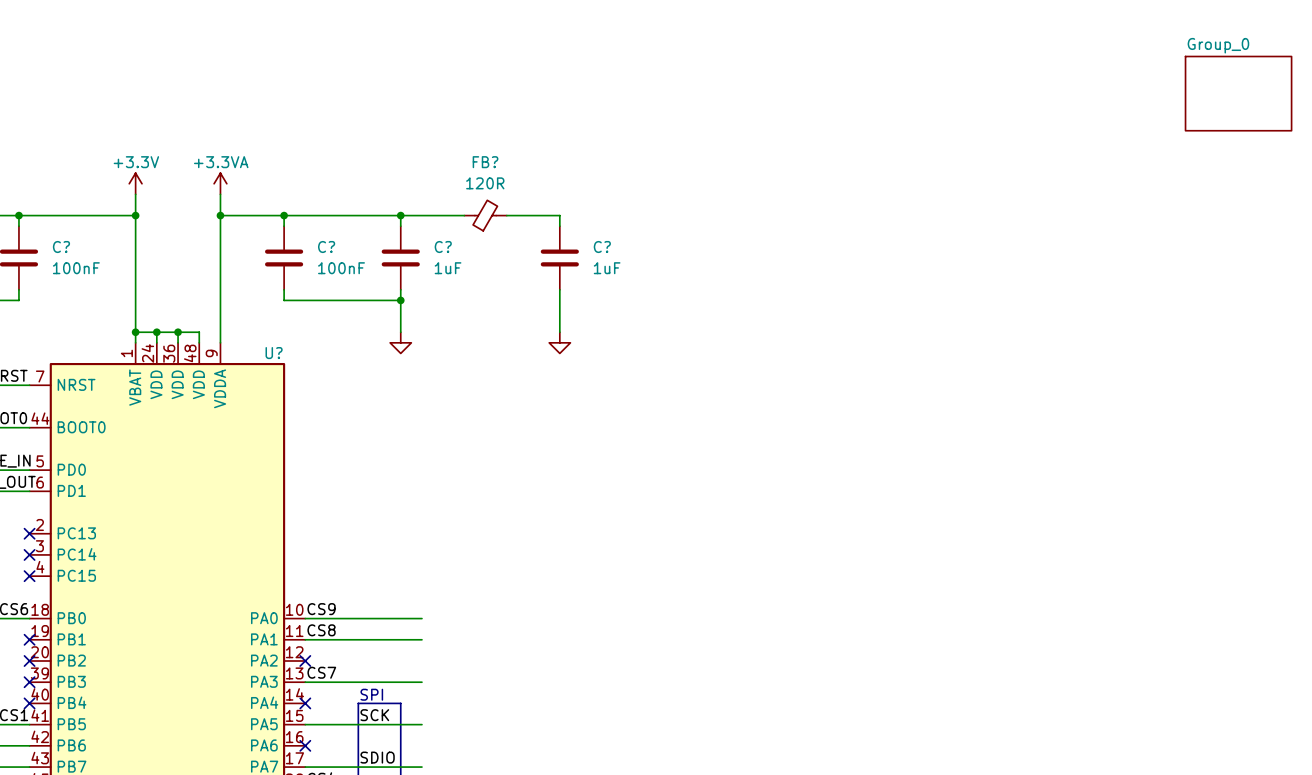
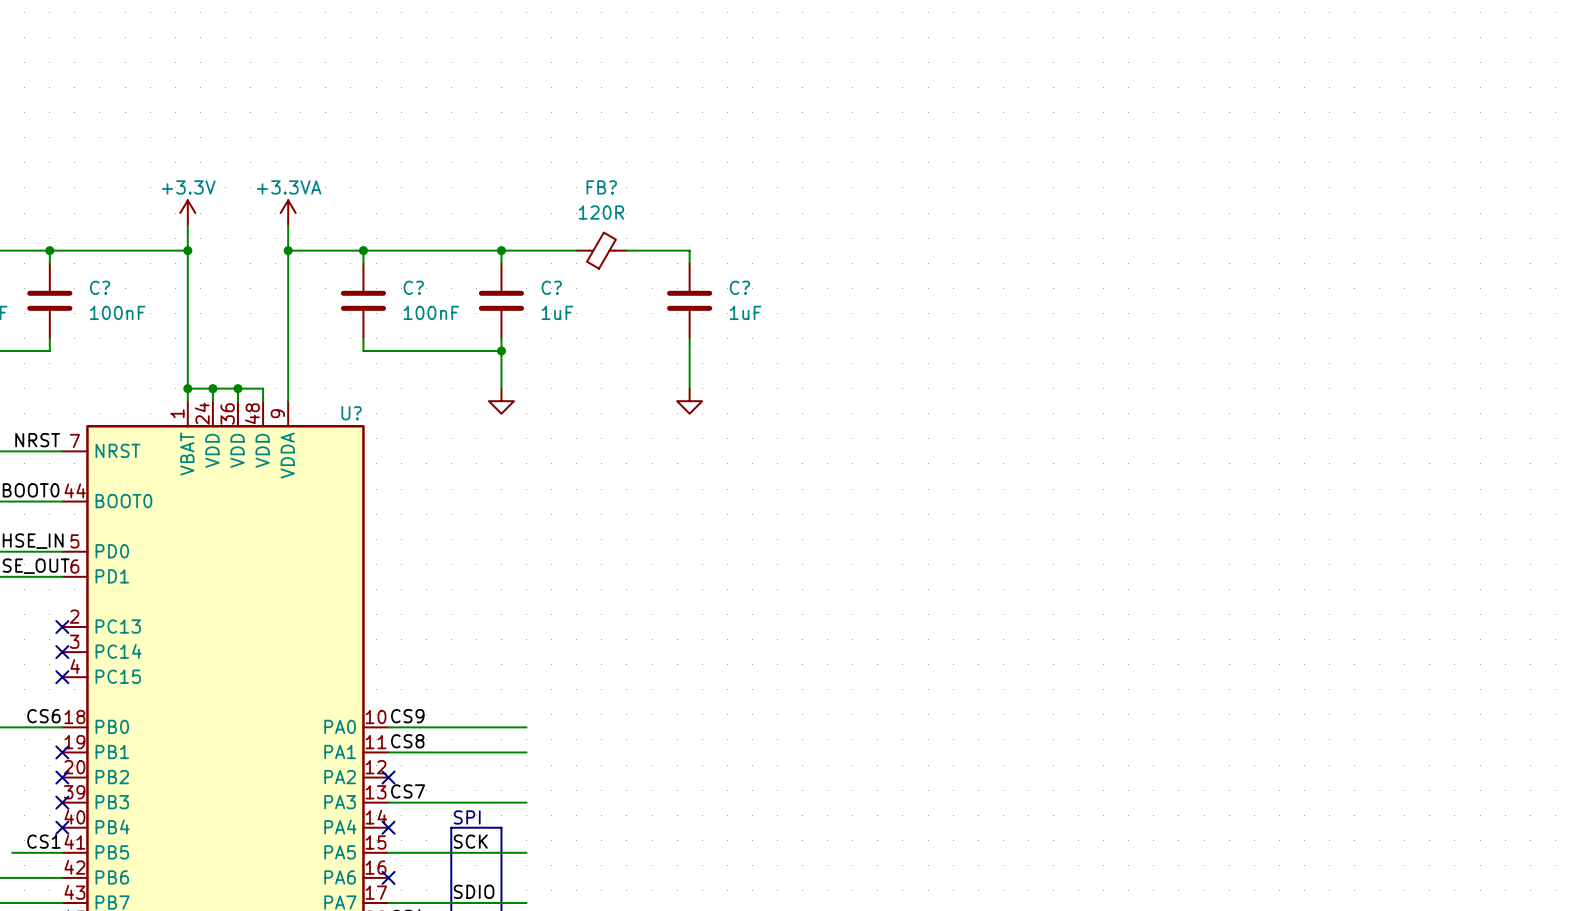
sheet Group_0: (1238, 93) -> none

